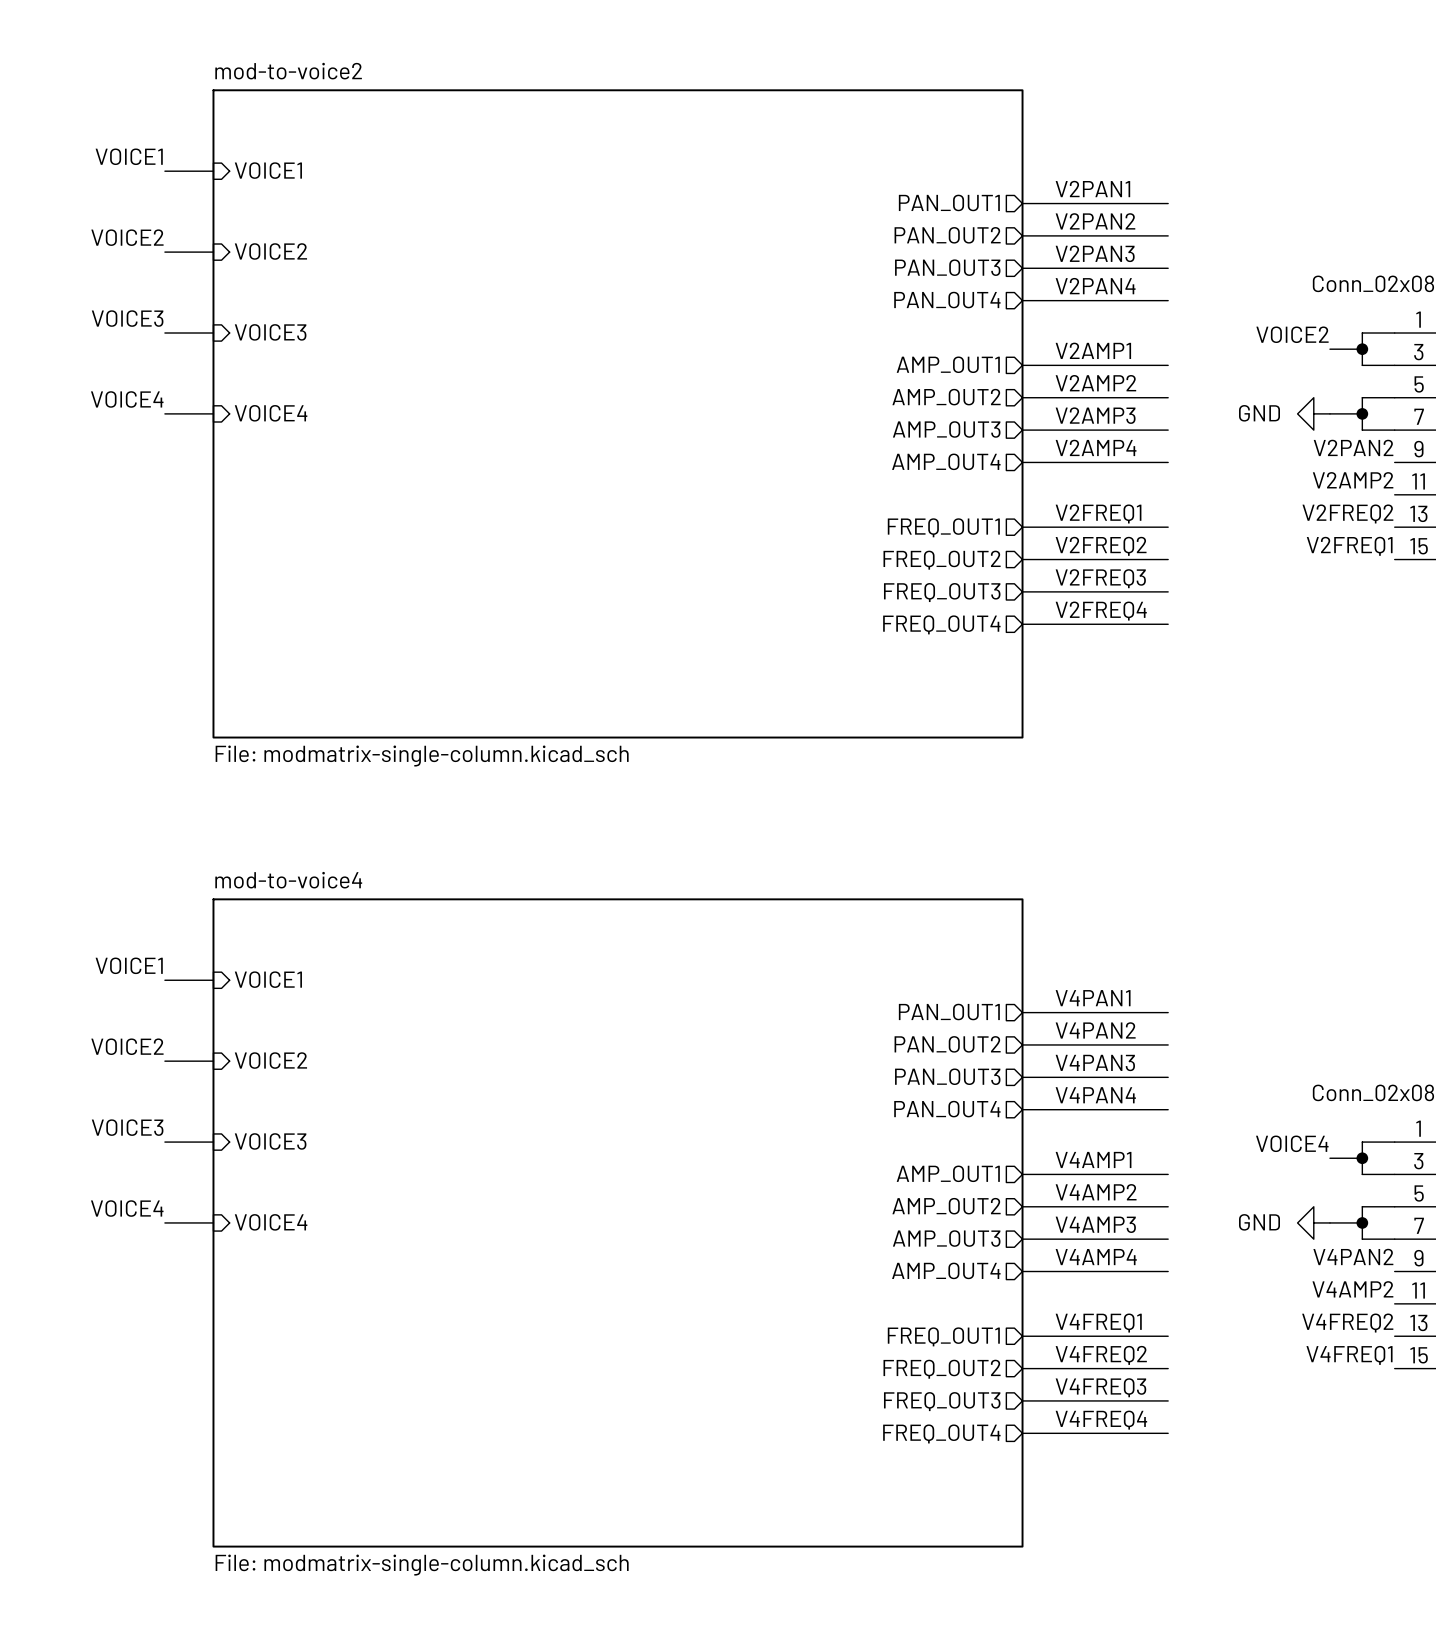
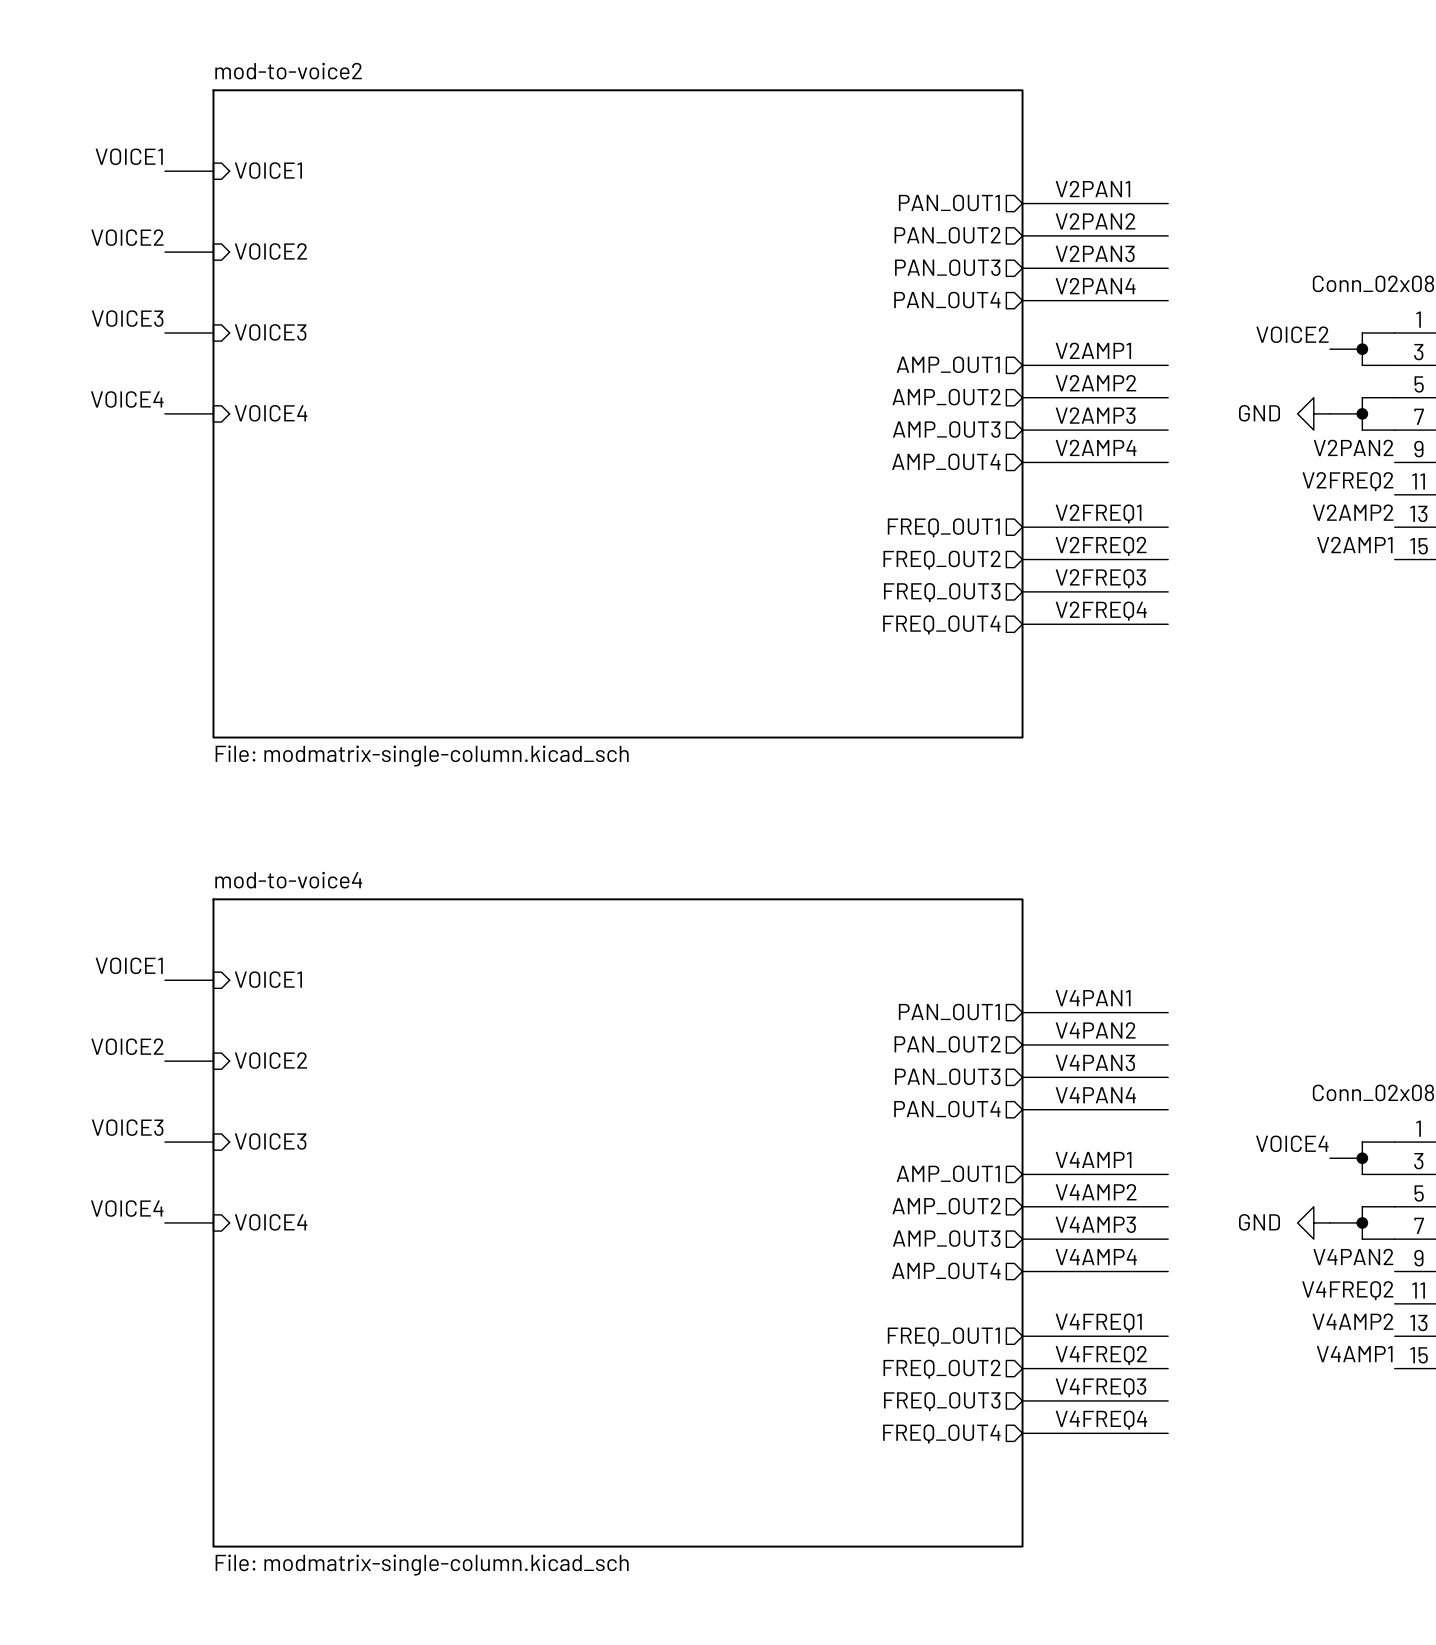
label: V2AMP2 (1353, 480) -> V2FREQ2 (1347, 481)
label: V2FREQ2 (1347, 513) -> V2AMP2 (1353, 512)
label: V2FREQ1 (1349, 546) -> V2AMP1 (1354, 545)
label: V4AMP2 (1352, 1289) -> V4FREQ2 (1347, 1290)
label: V4FREQ2 (1347, 1323) -> V4AMP2 (1352, 1321)
label: V4FREQ1 (1349, 1355) -> V4AMP1 (1354, 1354)

